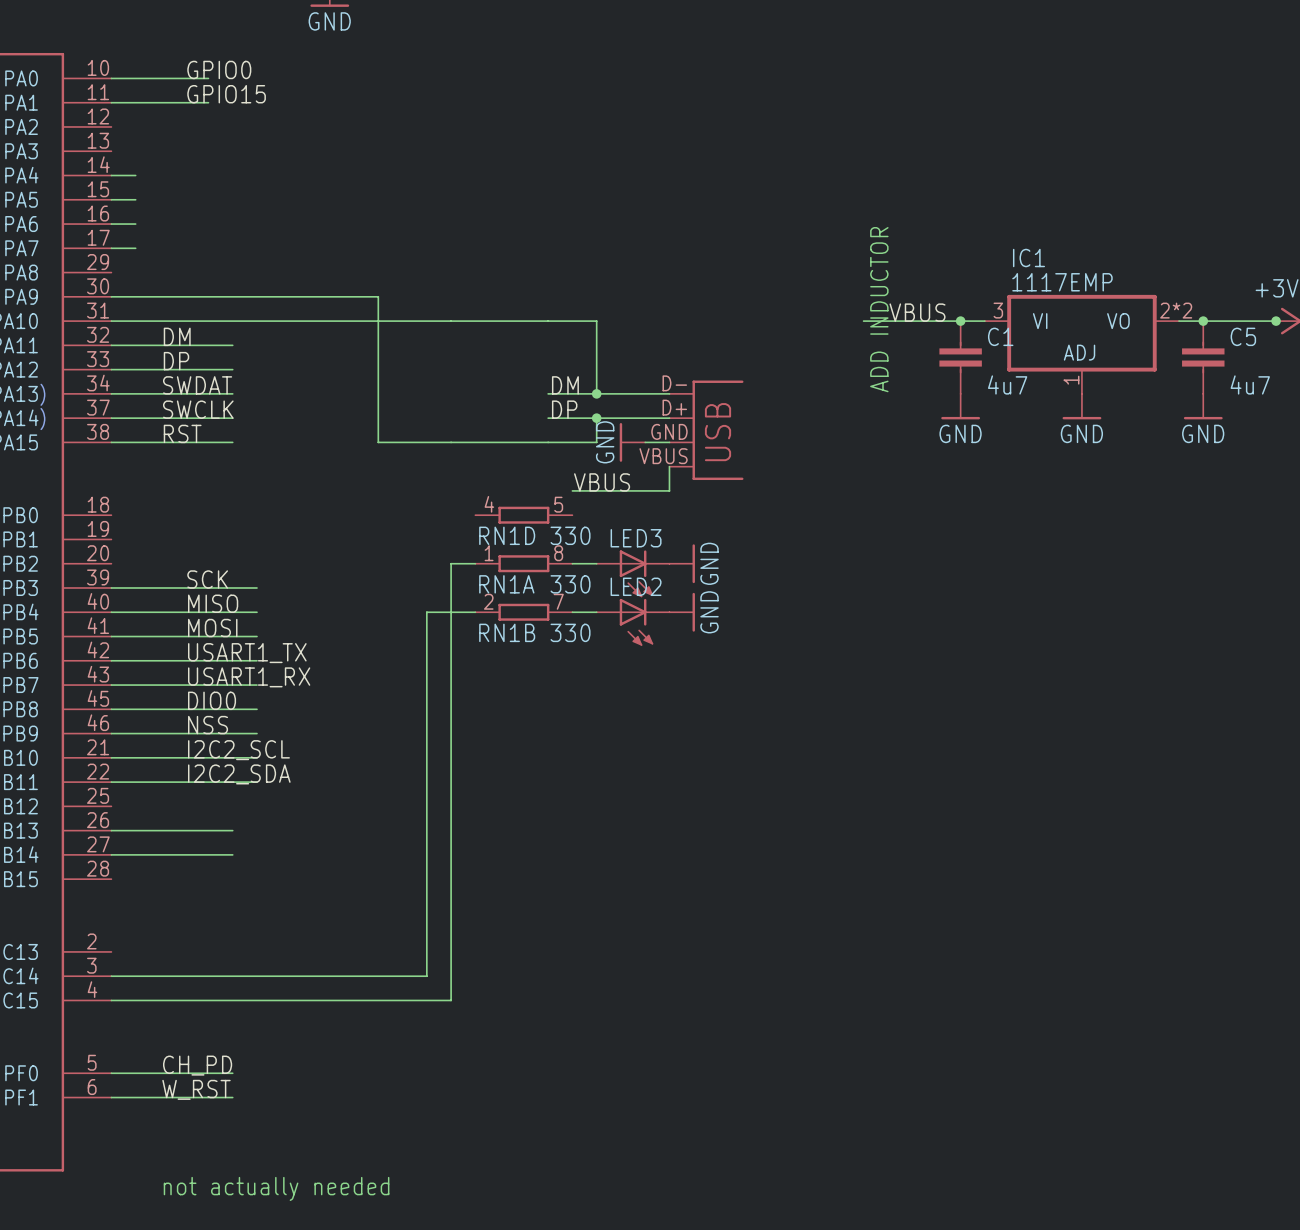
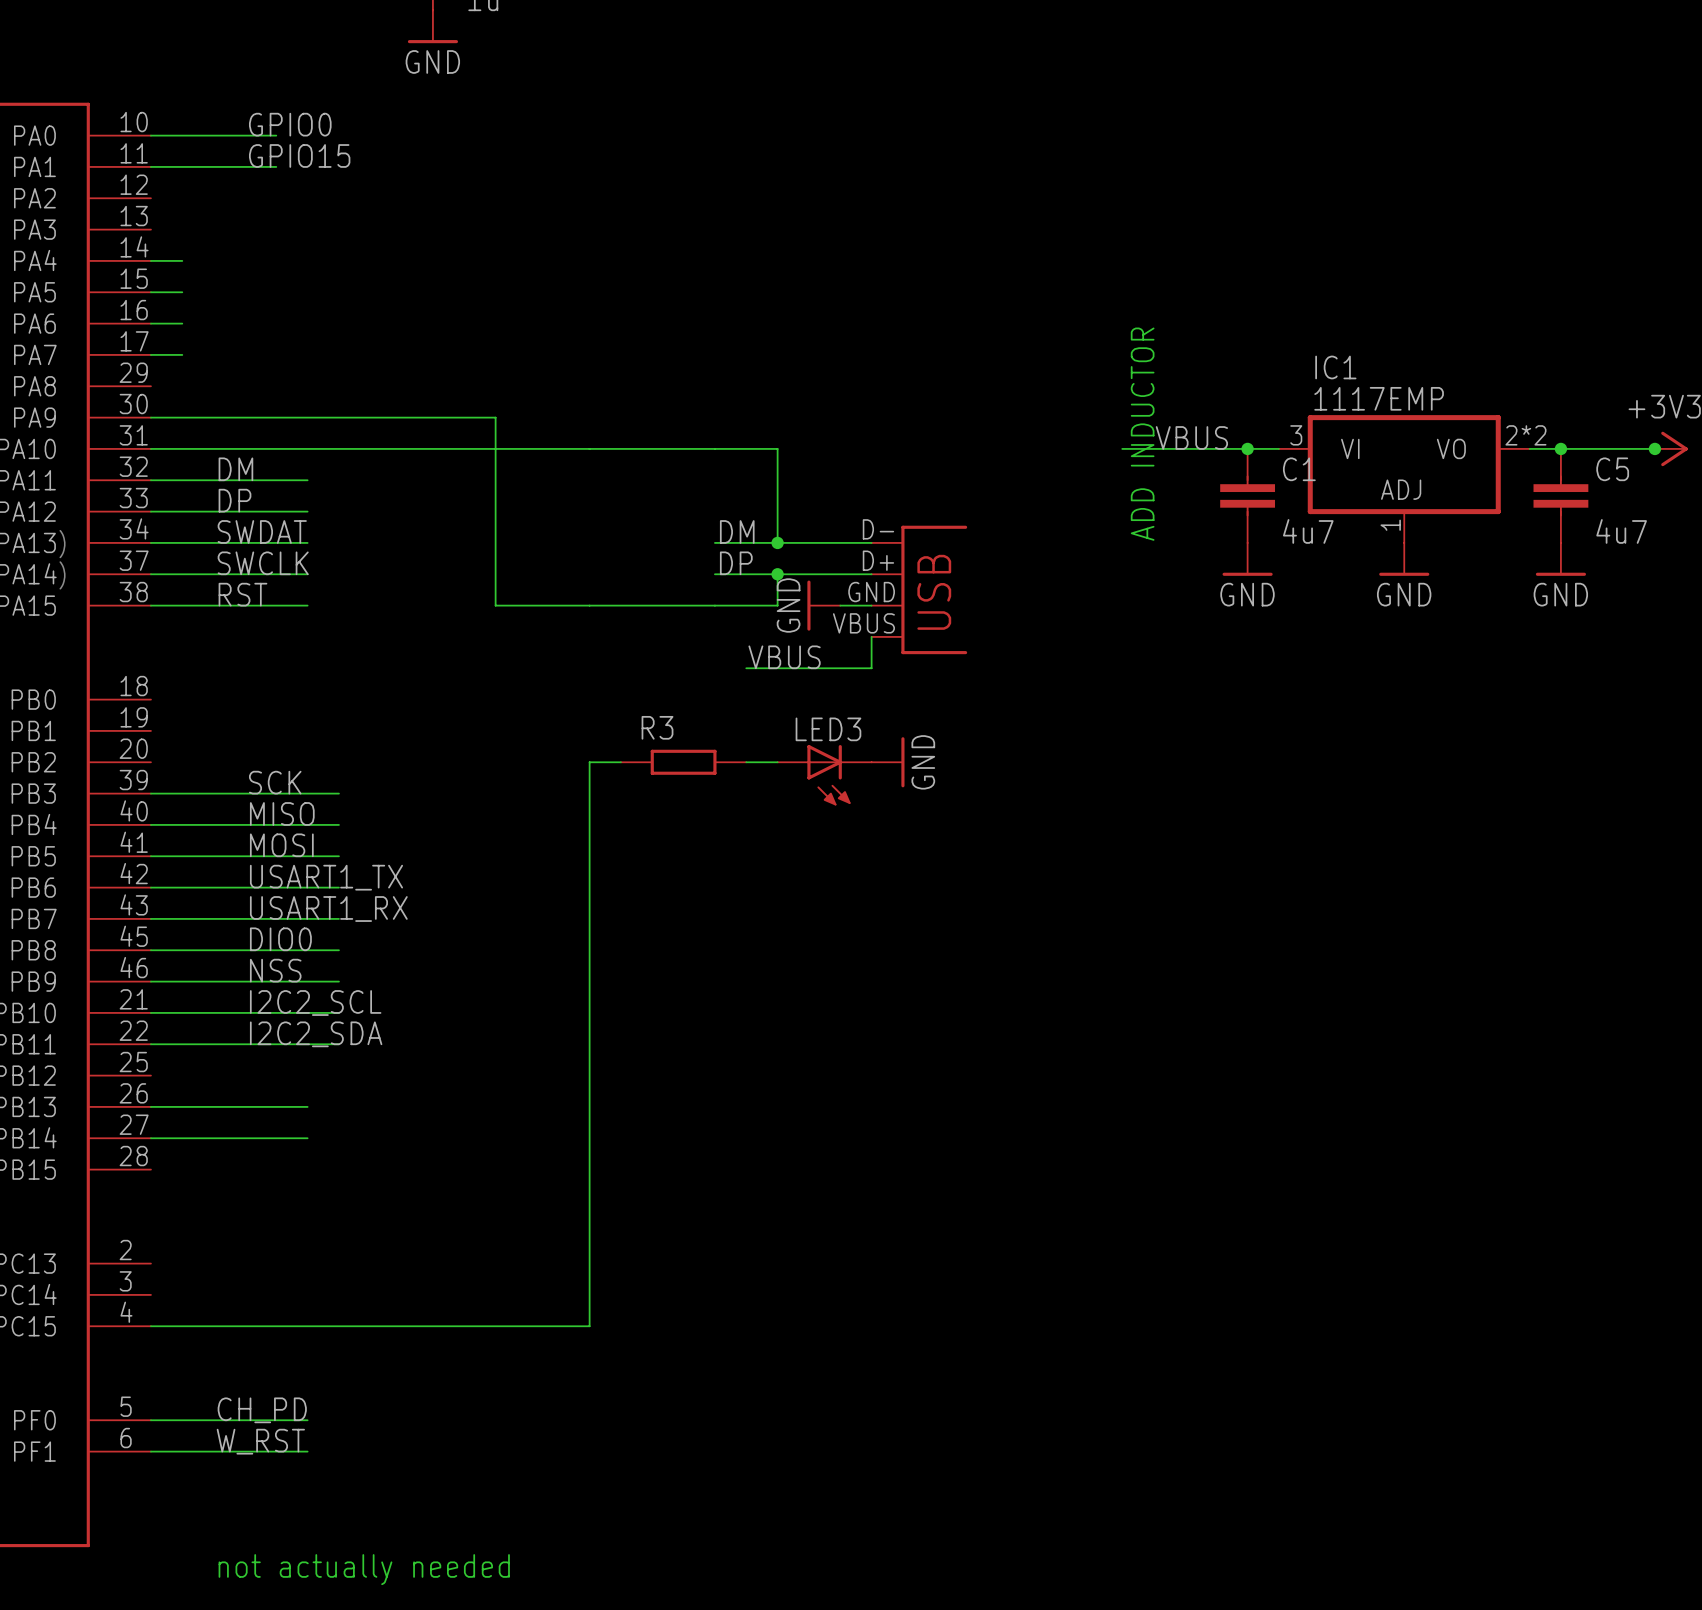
RN1D: 330 (523, 515) -> none
RN1A: 330 (523, 563) -> none
R3: none -> (683, 762)
wire: (475, 612) (426, 612) (426, 976) (111, 976) -> none
RN1B: 330 (523, 612) -> none
wire: (572, 612) (596, 612) -> none
power symbol: GND (682, 612) -> none
LED2: (633, 622) -> none

